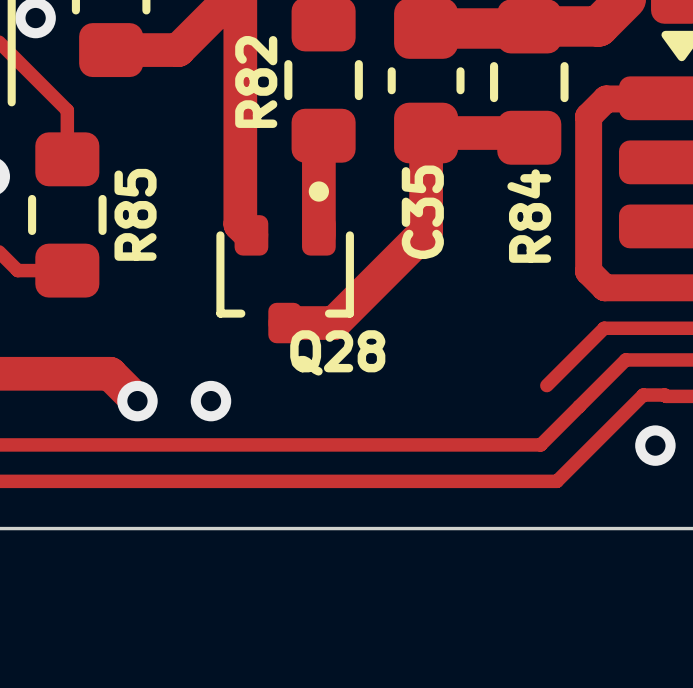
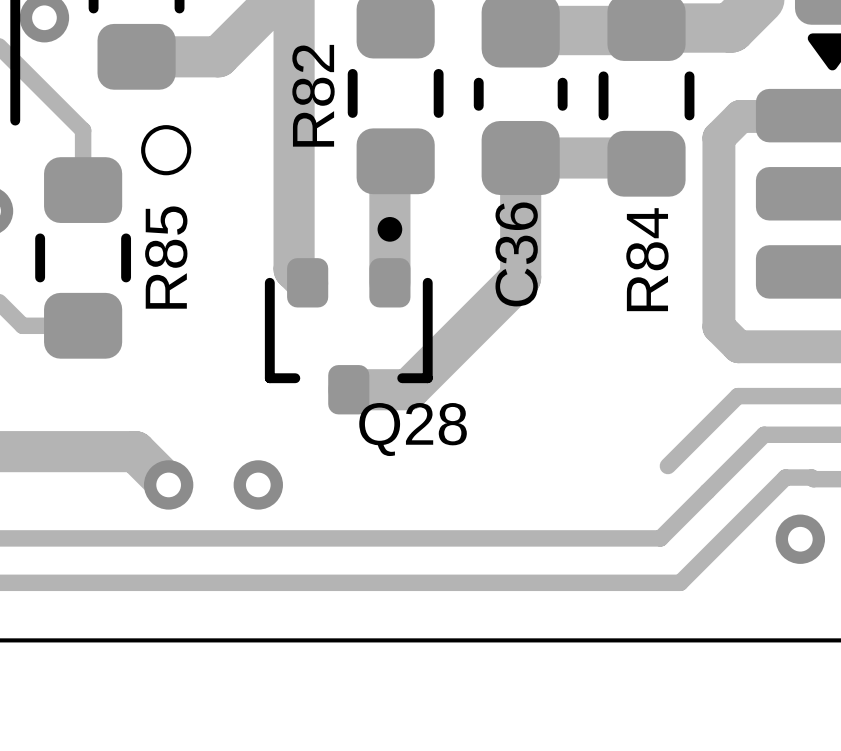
round board edge: none -> [141, 125, 192, 176]
C35 name: C35 (422, 212) -> C36 (516, 254)

